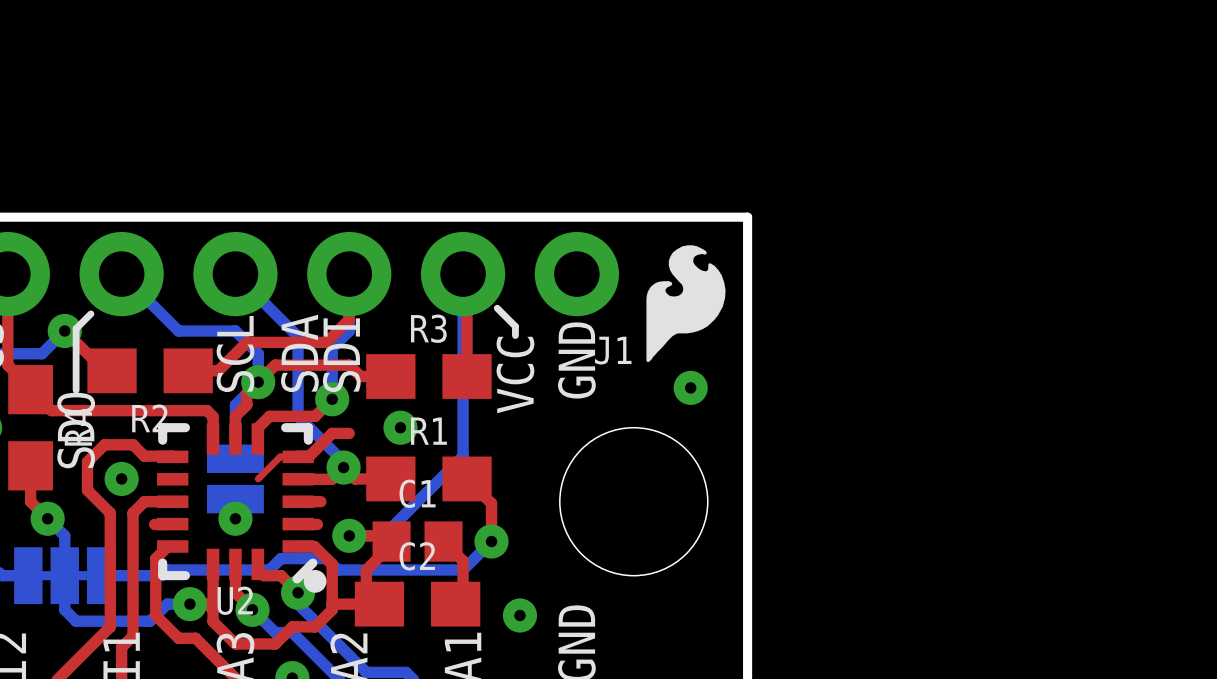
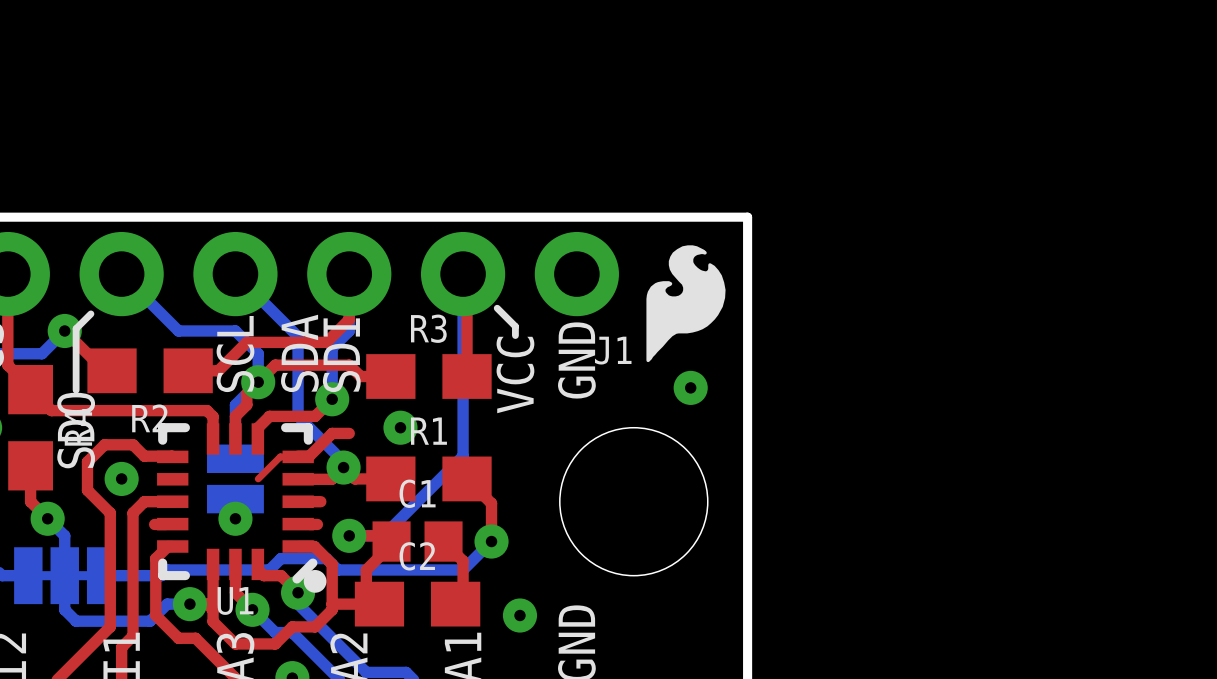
U2 name: U2 (235, 600) -> U1 (235, 600)

